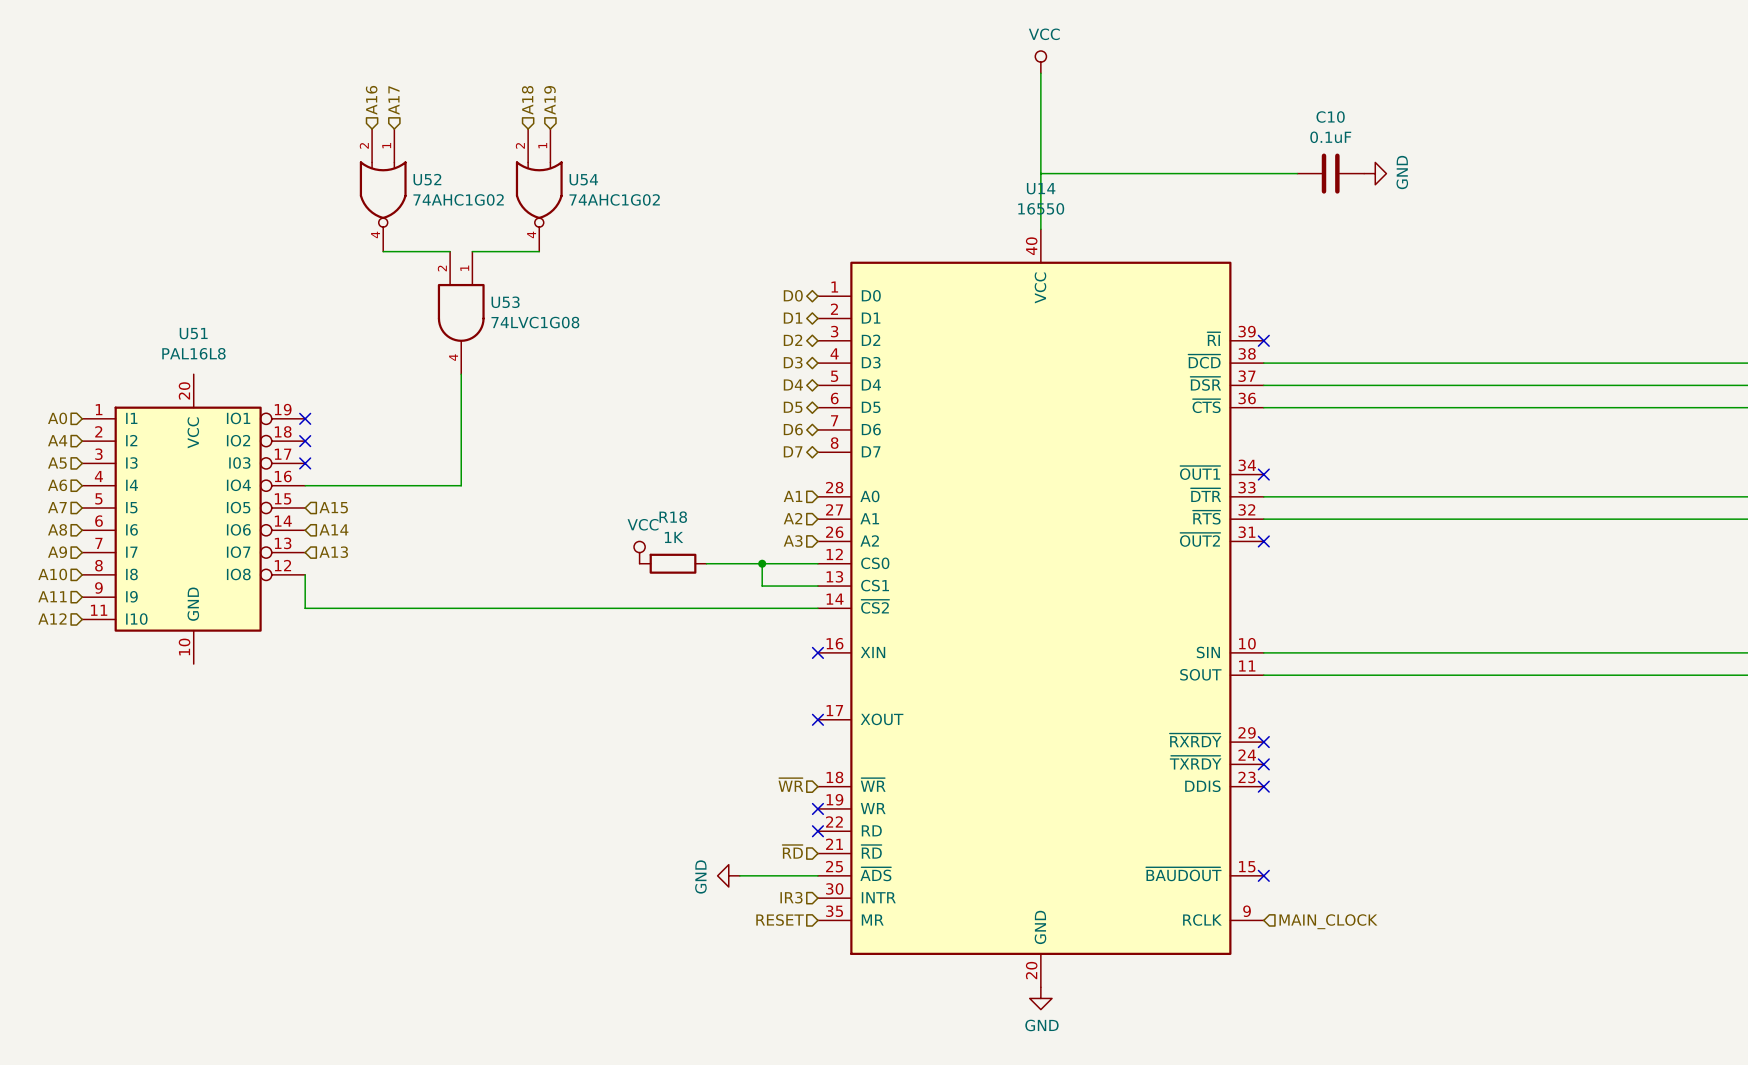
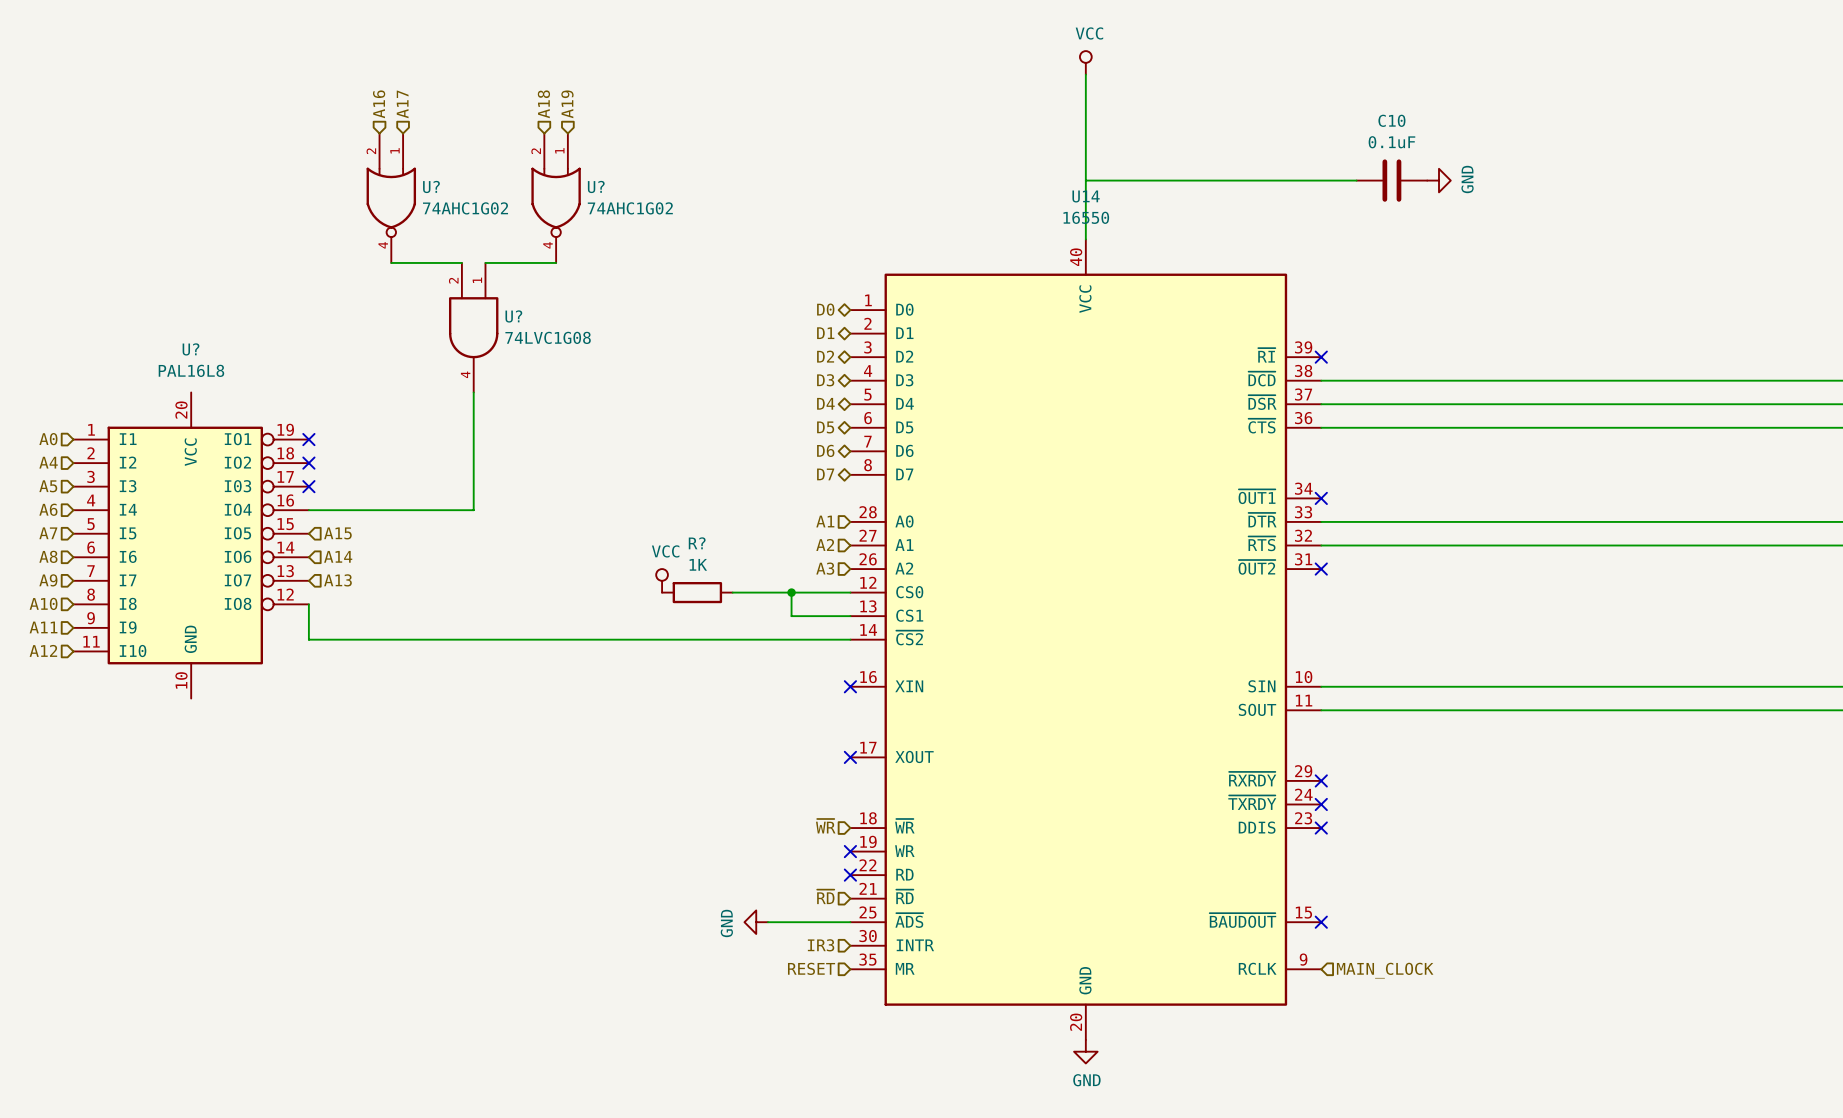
U52 name: U52 (427, 179) -> U? (431, 186)
U54 name: U54 (583, 179) -> U? (596, 186)
U53 name: U53 (505, 302) -> U? (513, 316)
U51 name: U51 (193, 333) -> U? (191, 349)
R18 name: R18 (673, 517) -> R? (697, 543)

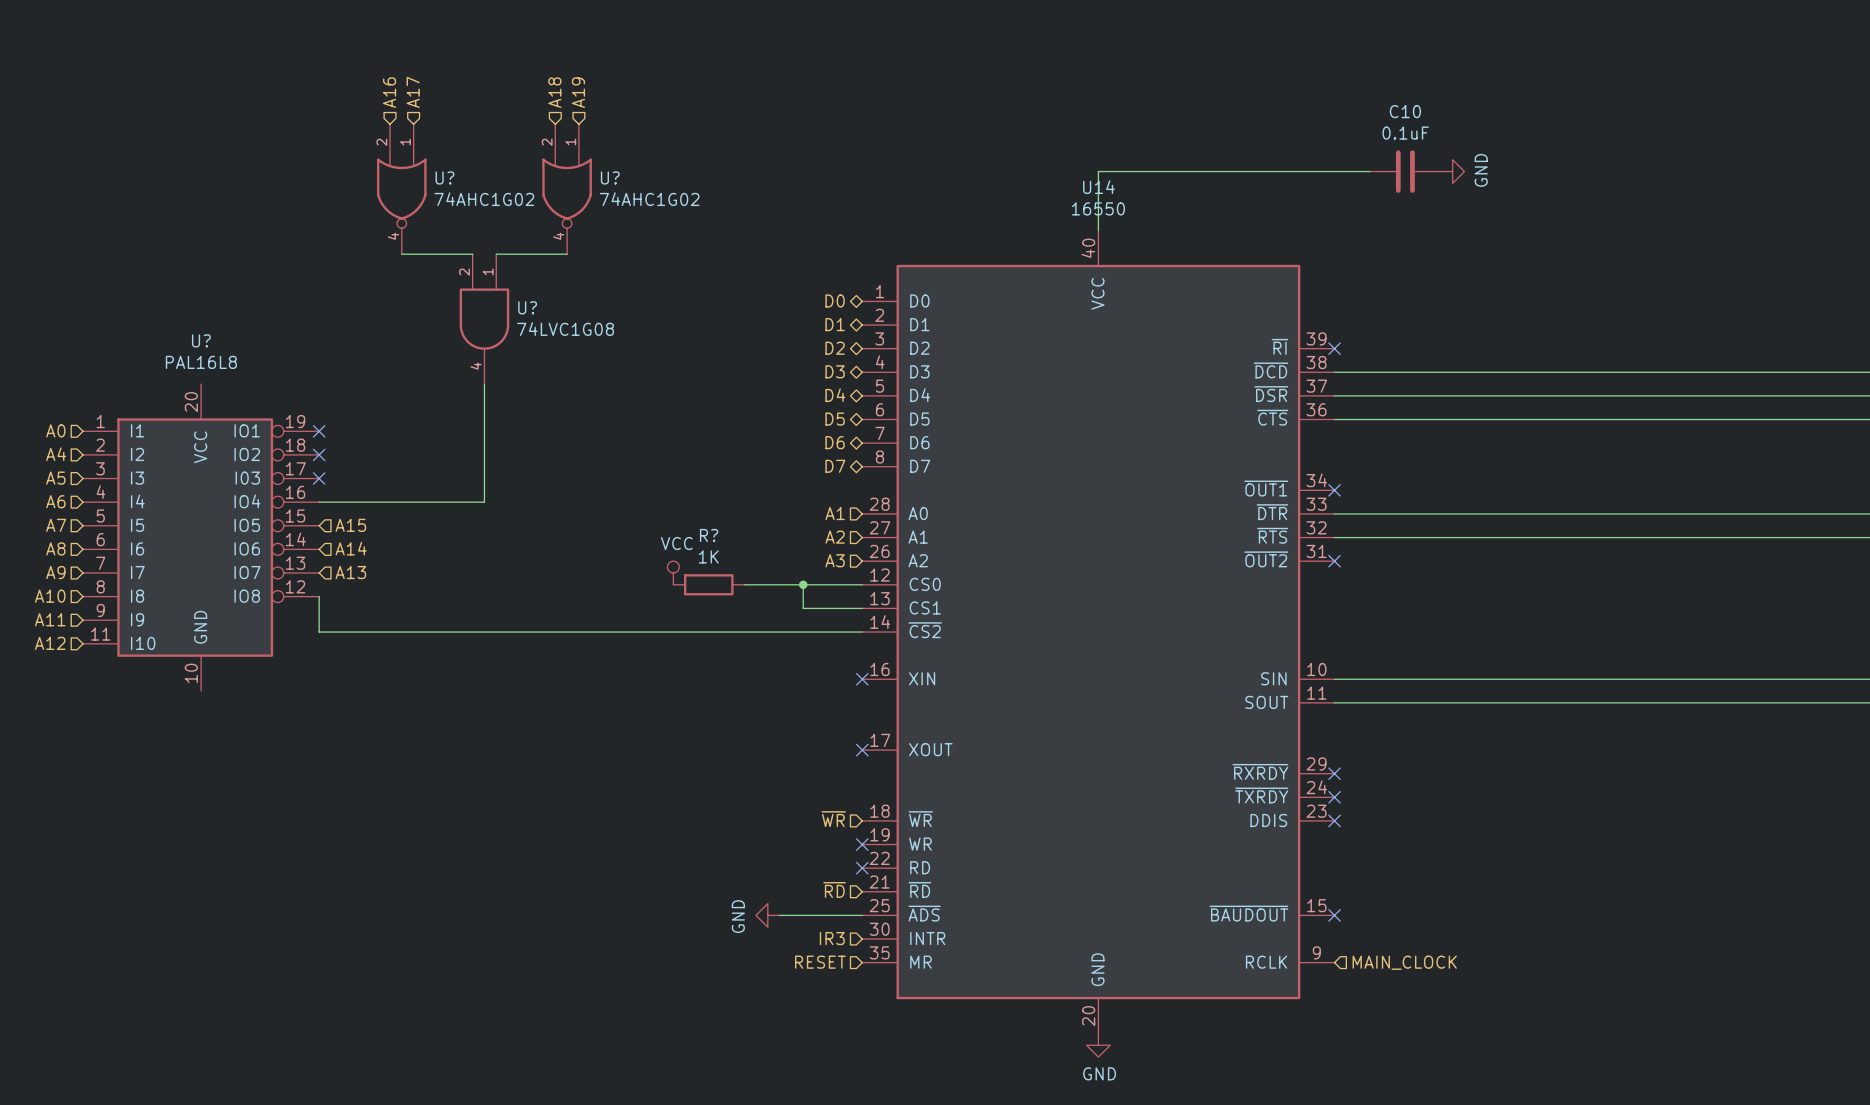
power symbol: VCC (1085, 62) -> none
wire: (1085, 74) (1085, 180) -> none

